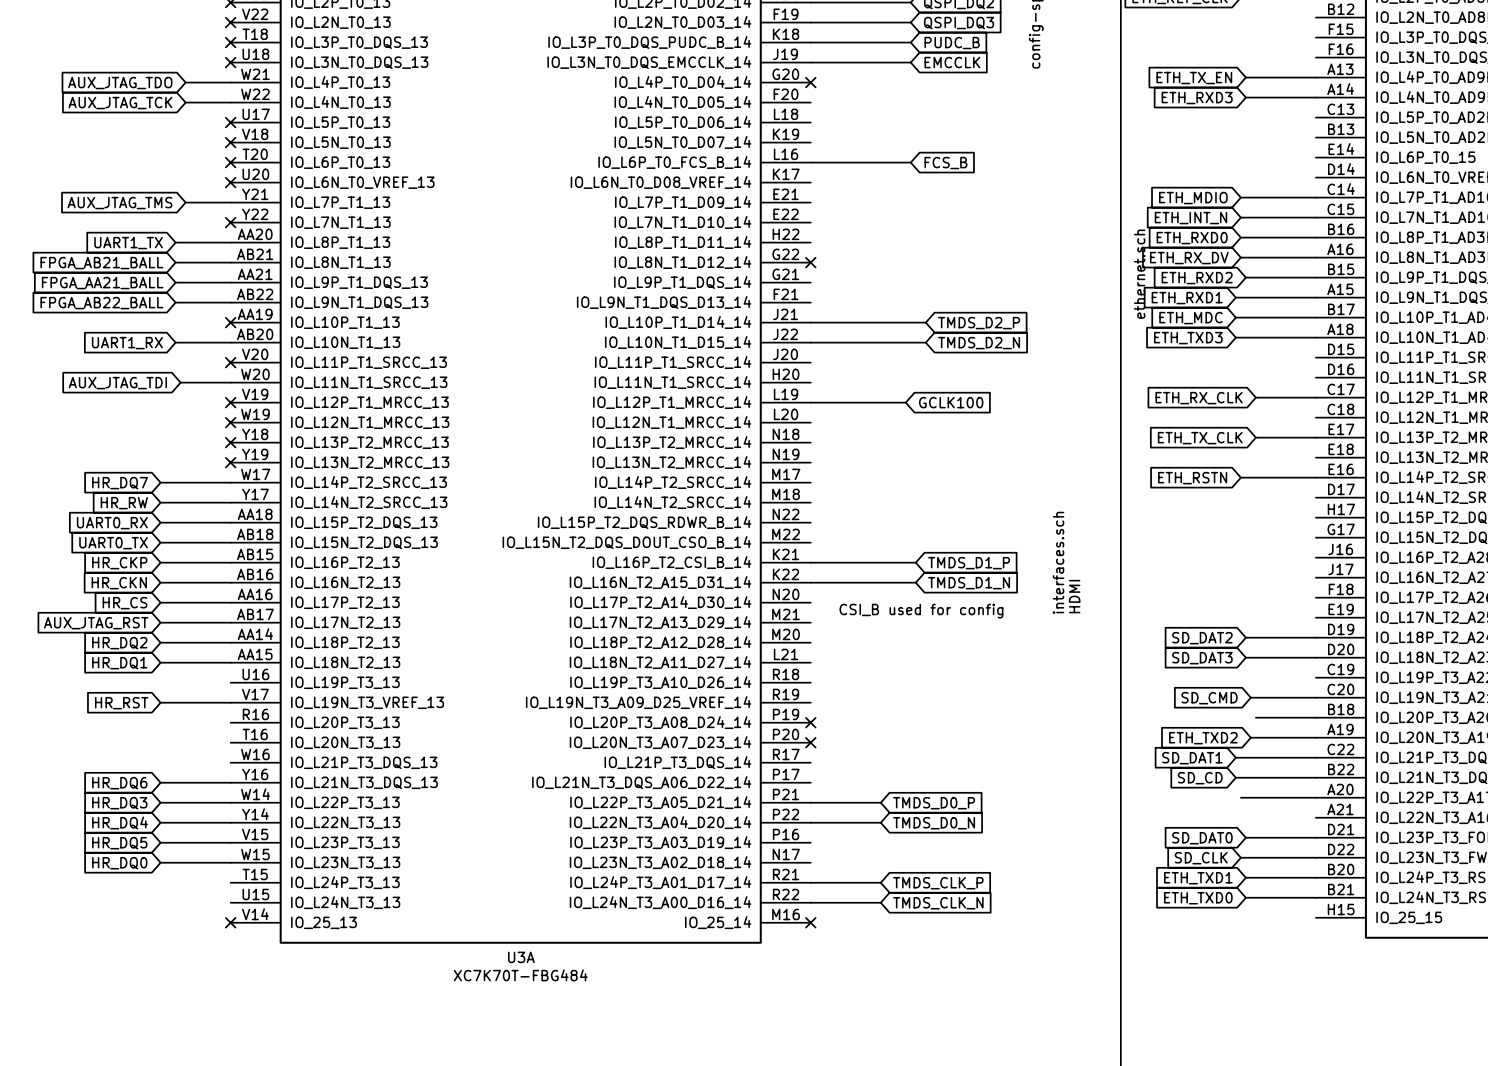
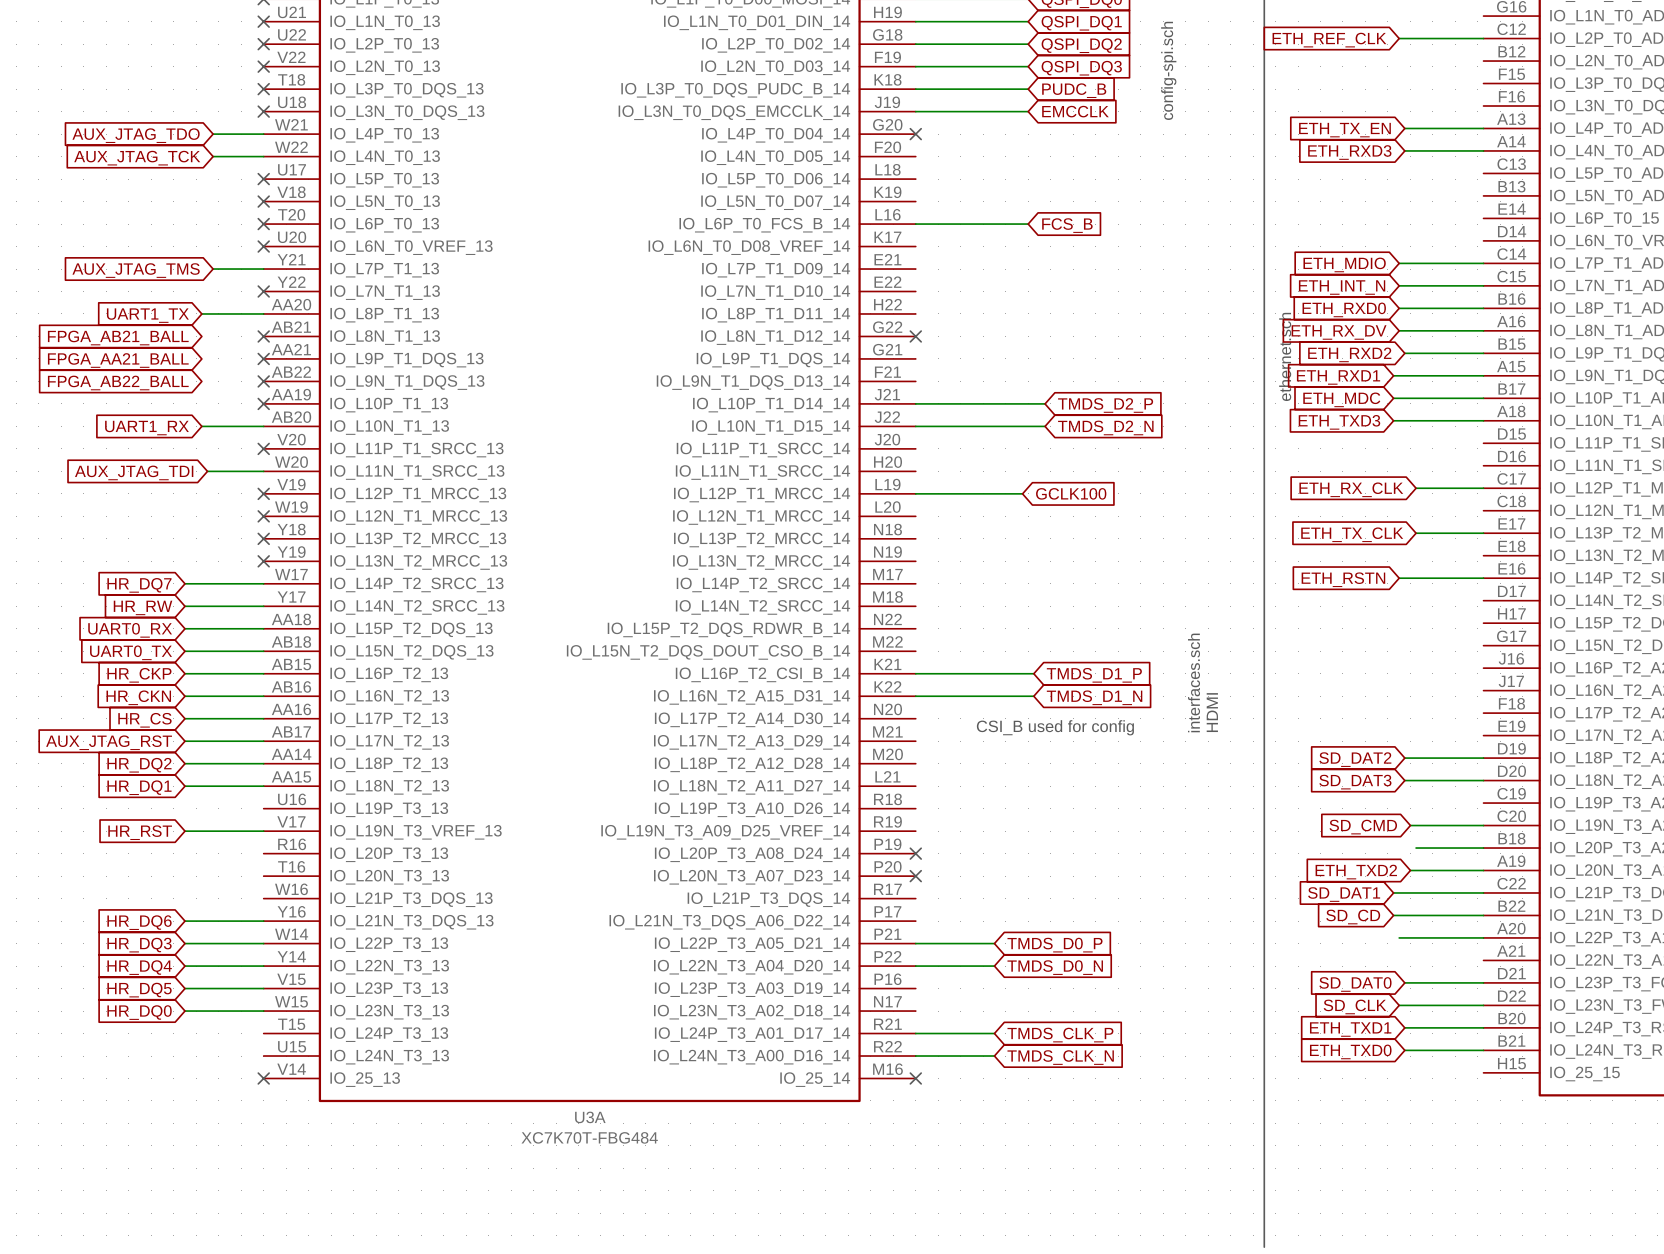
wire: (175, 262) (230, 262) -> none
no-connect mark: none -> (263, 336)
wire: (175, 282) (230, 282) -> none
no-connect mark: none -> (263, 358)
wire: (175, 302) (230, 302) -> none
no-connect mark: none -> (263, 381)

